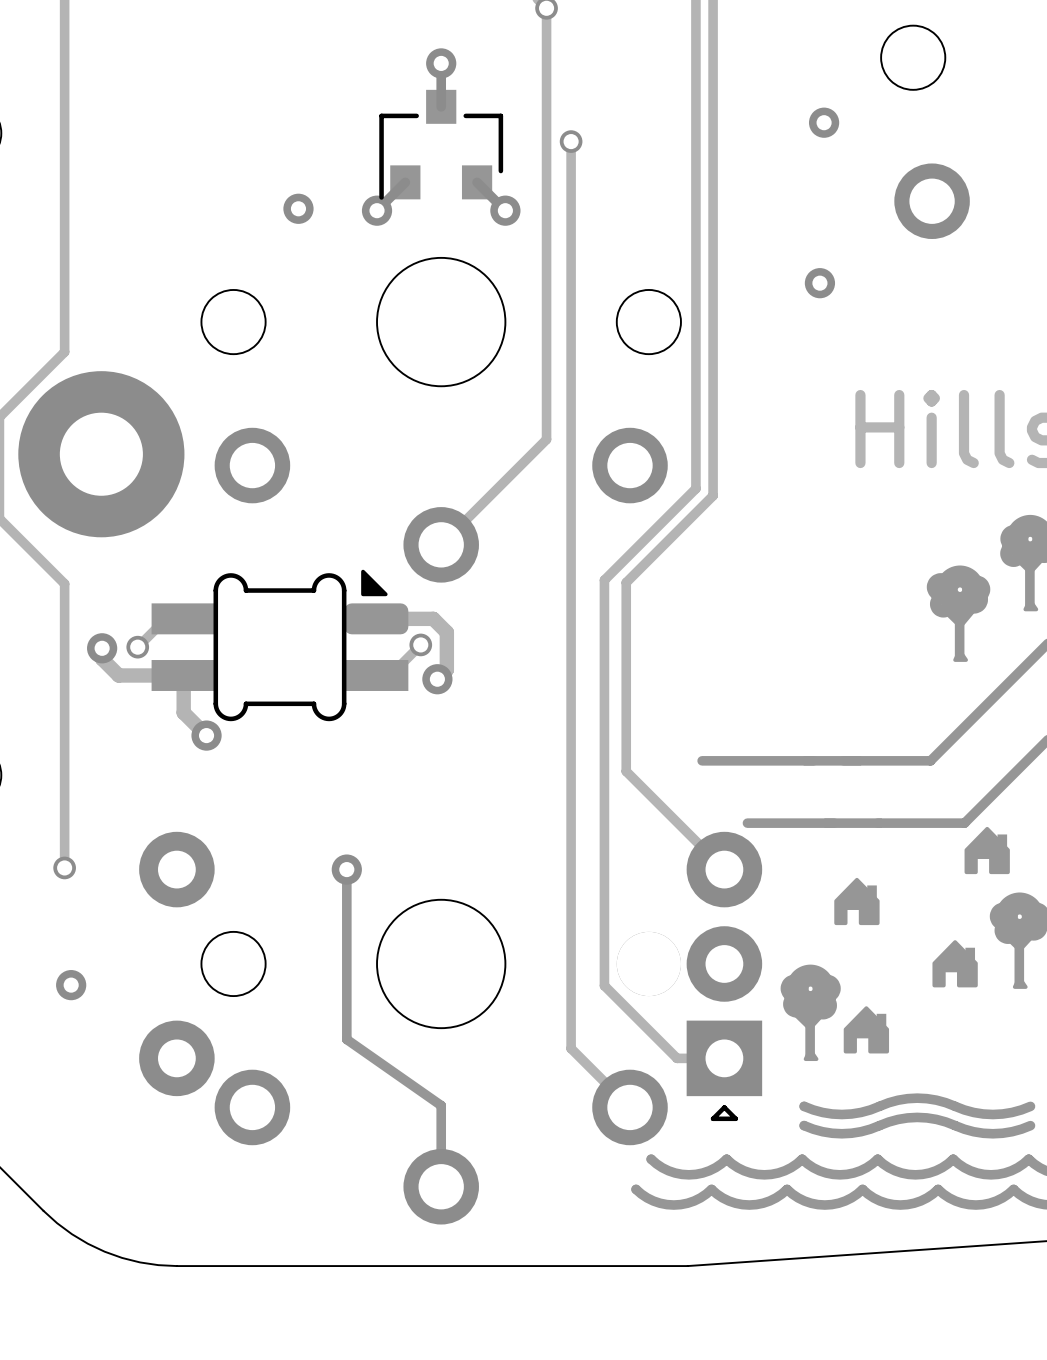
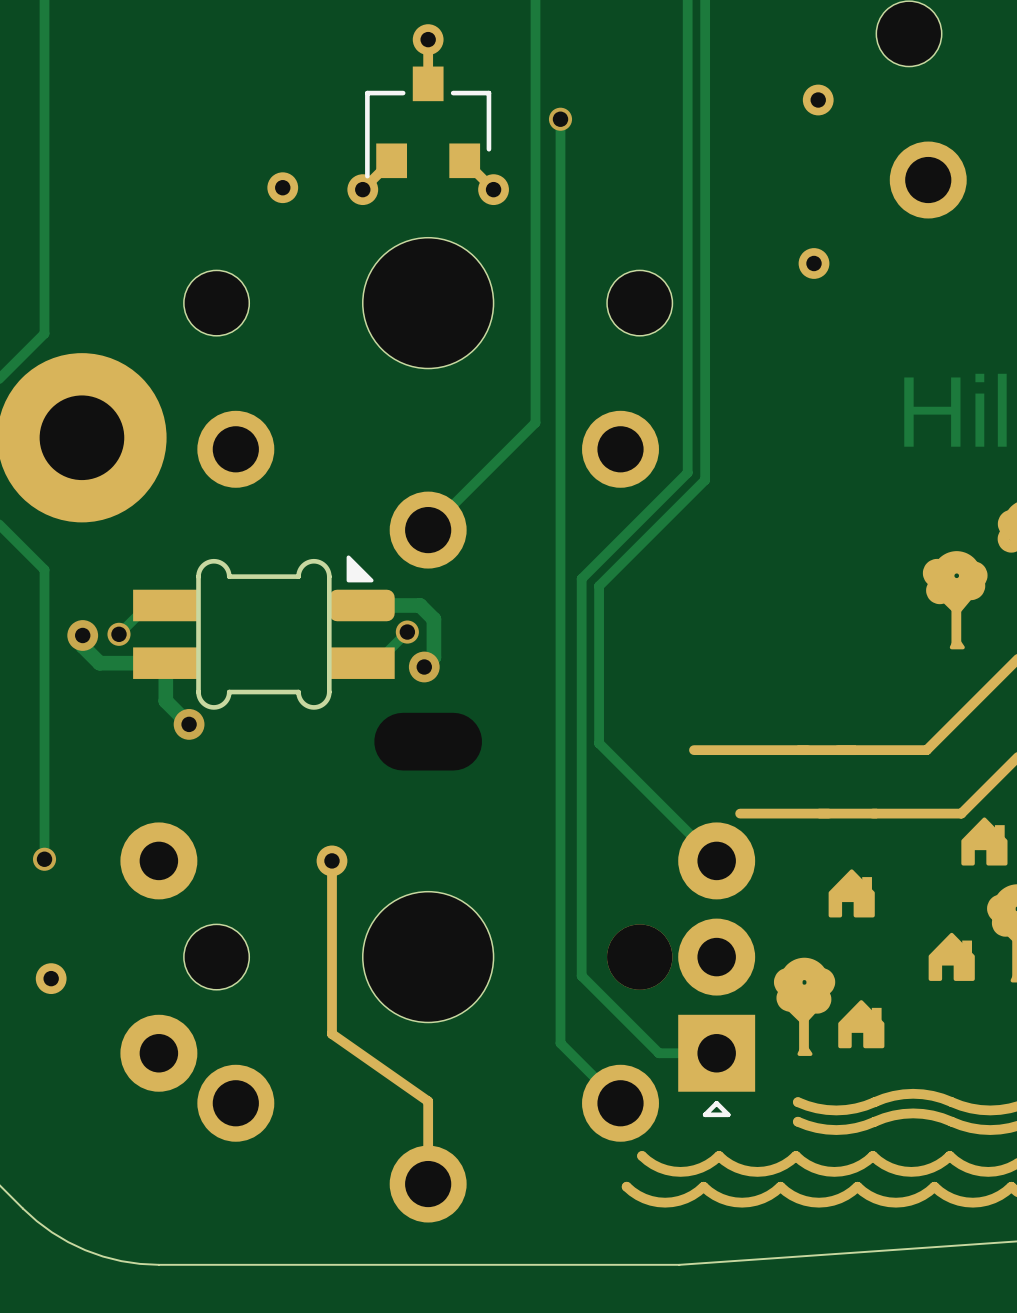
track: (604, 580) (604, 985) (677, 1058) -> (594, 566) (581, 578) (581, 975) (658, 1053) (668, 1053)
track: (626, 582) (626, 771) -> (616, 568) (599, 586) (599, 743) (616, 760)

